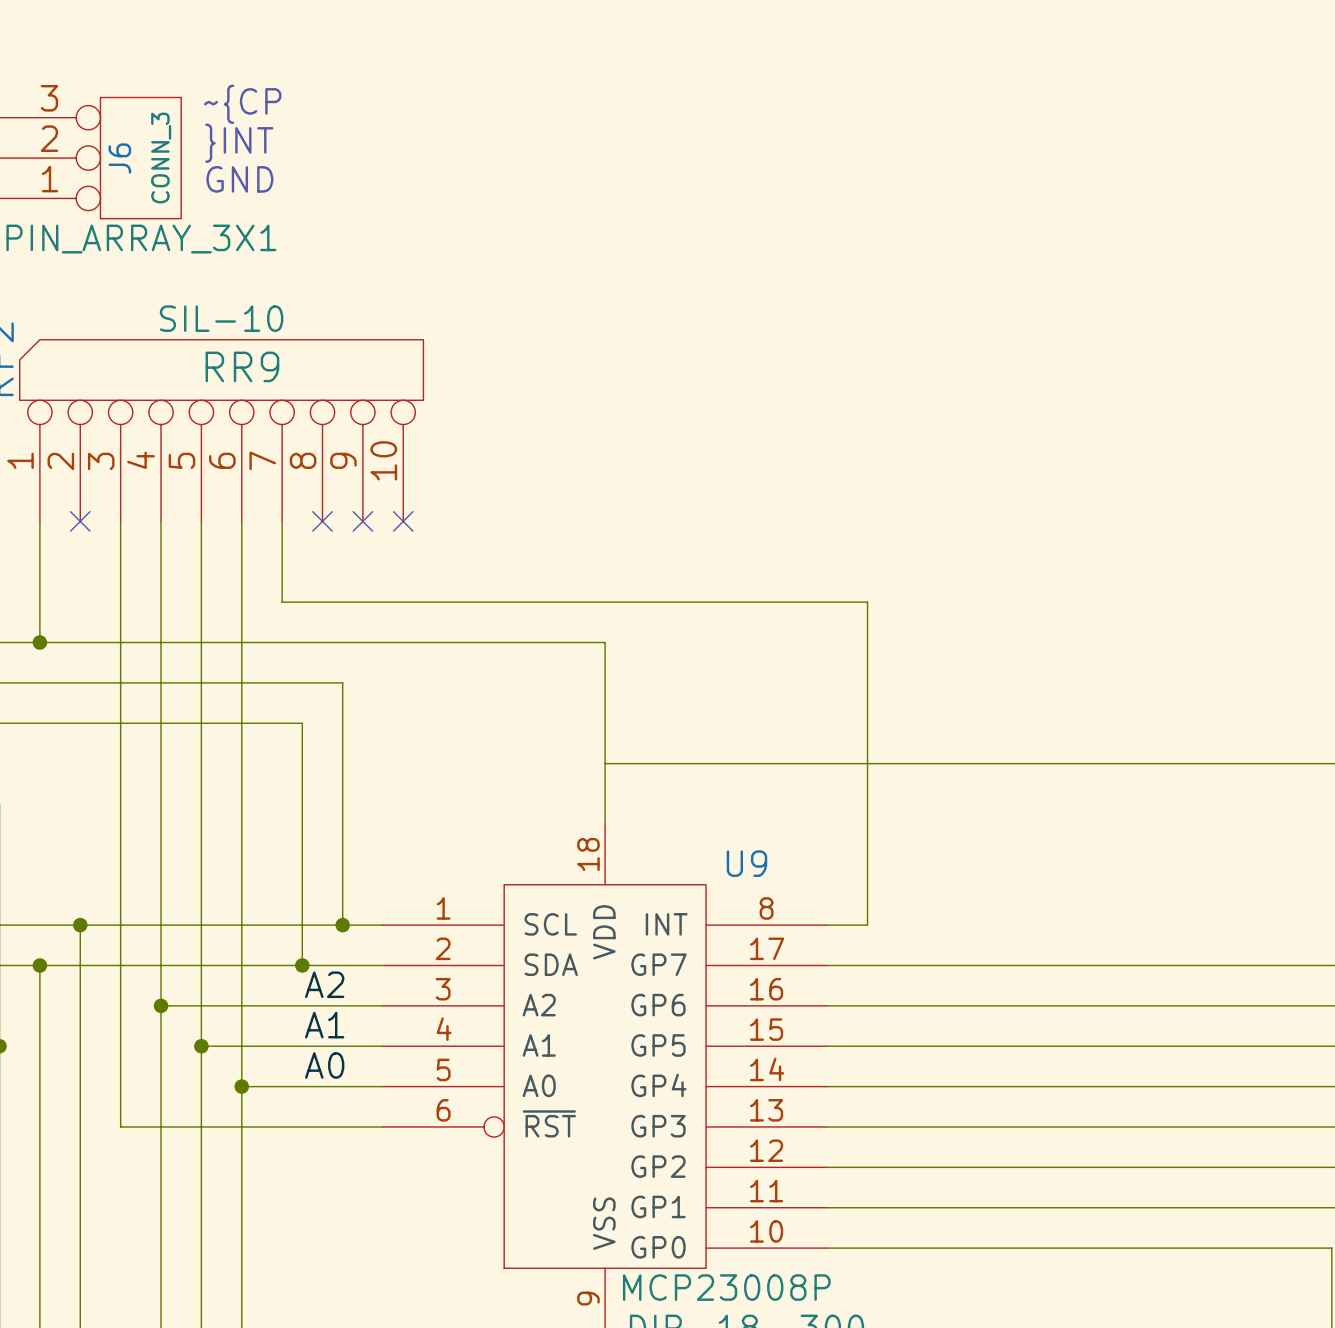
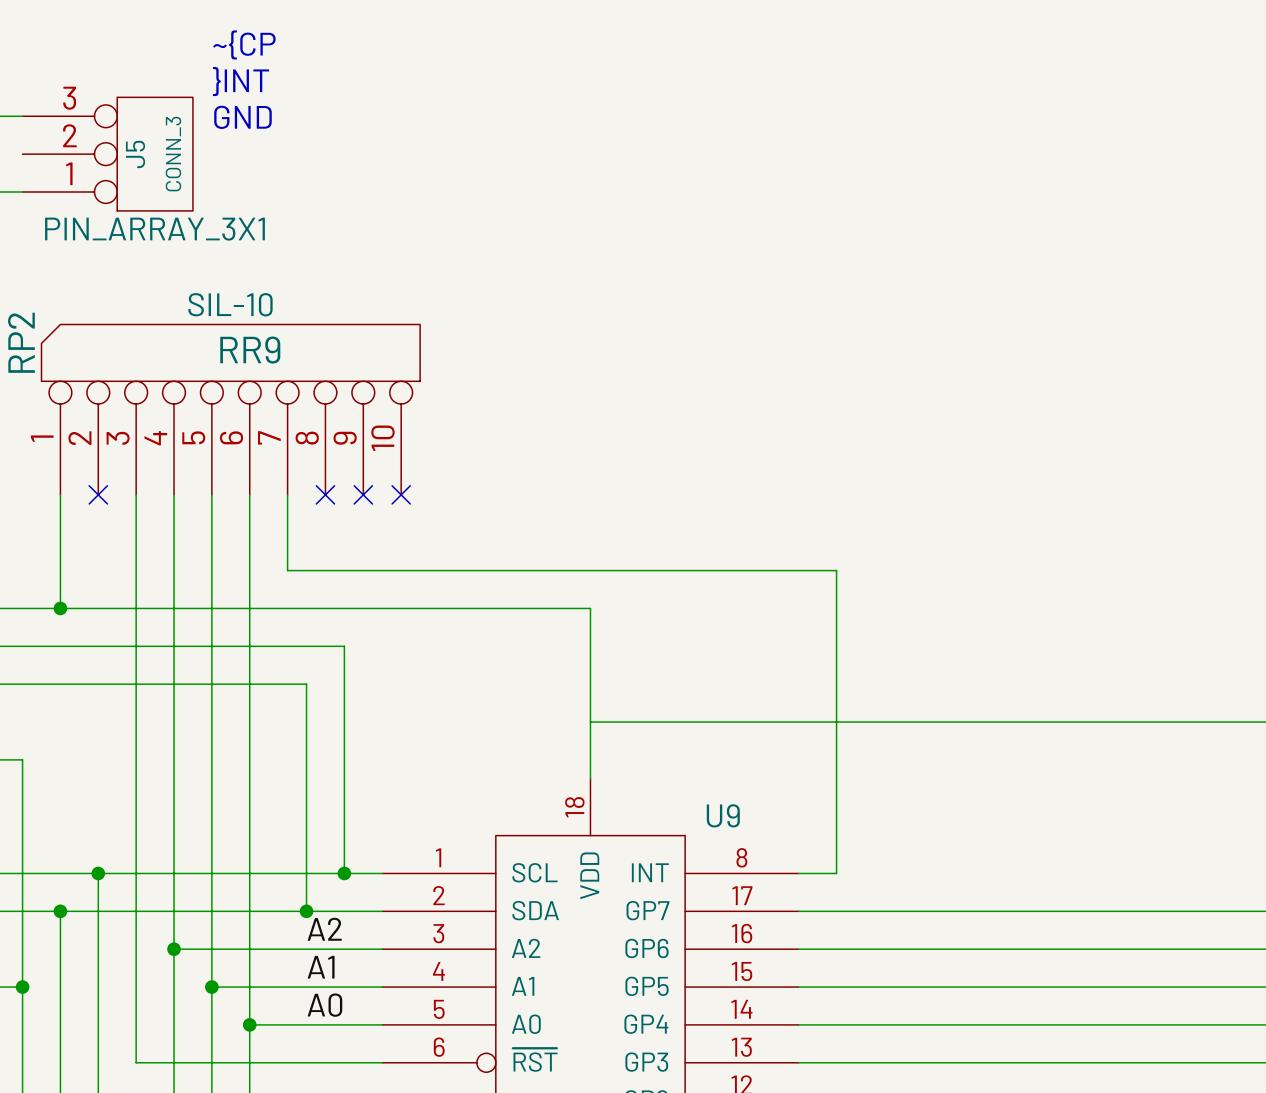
text position: ~{CP (242, 104) -> ~{CP (244, 44)
text position: }INT (239, 143) -> }INT (241, 81)
J6 name: J6 (119, 158) -> J5 (135, 154)
text position: GND (239, 179) -> GND (242, 117)

